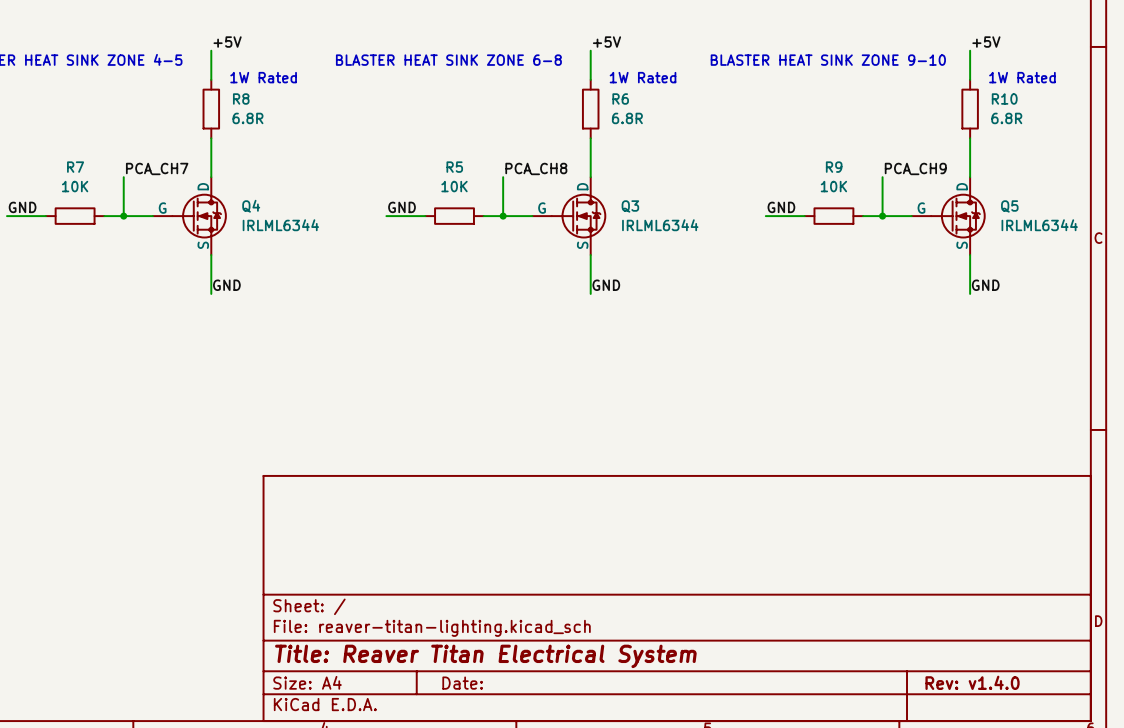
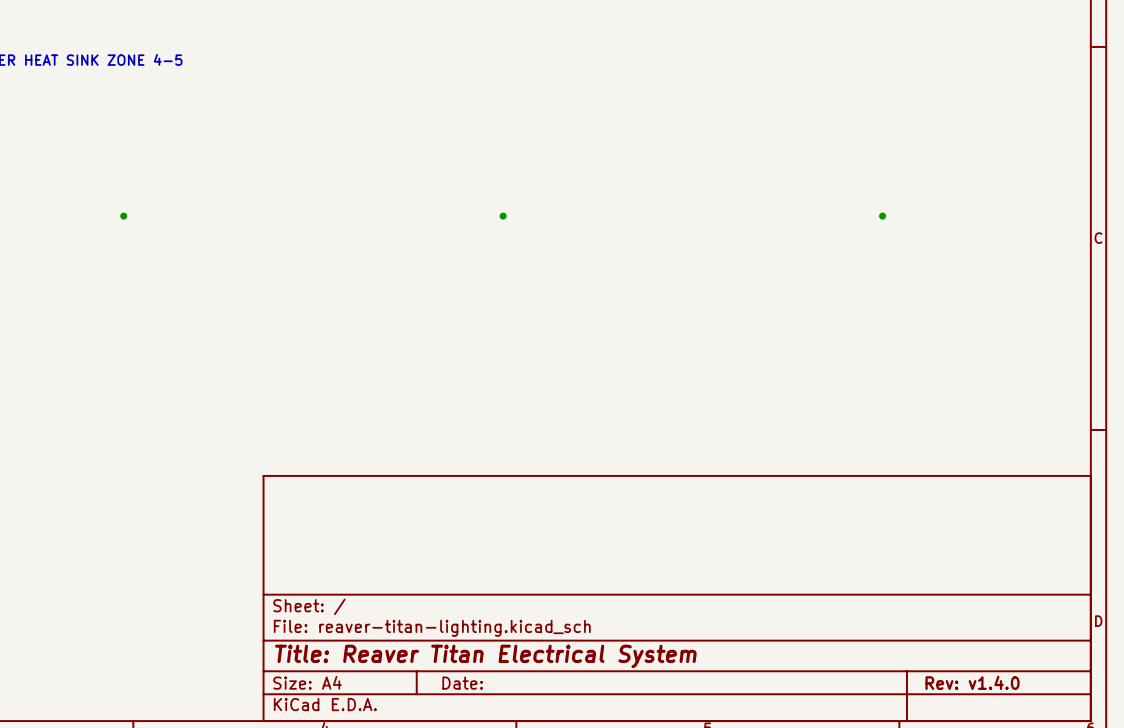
label: +5V (227, 42) -> none
label: +5V (607, 42) -> none
label: +5V (986, 42) -> none
wire: (211, 50) (211, 79) -> none
wire: (590, 50) (590, 79) -> none
wire: (970, 50) (970, 79) -> none
text: BLASTER HEAT SINK ZONE 6-8 (448, 60) -> none
text: BLASTER HEAT SINK ZONE 9-10 (828, 60) -> none
text: 1W Rated (263, 77) -> none
text: 1W Rated (643, 77) -> none
text: 1W Rated (1022, 77) -> none
R8: 6.8R (211, 109) -> none
R6: 6.8R (590, 109) -> none
R10: 6.8R (970, 109) -> none
wire: (211, 138) (211, 177) -> none
wire: (590, 138) (590, 177) -> none
wire: (970, 138) (970, 177) -> none
label: PCA_CH7 (157, 168) -> none
label: PCA_CH8 (536, 168) -> none
label: PCA_CH9 (915, 168) -> none
wire: (123, 177) (123, 216) -> none
wire: (503, 177) (503, 216) -> none
wire: (882, 177) (882, 216) -> none
label: GND (22, 207) -> none
label: GND (402, 207) -> none
label: GND (781, 207) -> none
wire: (7, 216) (45, 216) -> none
R7: 10K (75, 216) -> none
wire: (104, 216) (152, 216) -> none
Q4: IRLML6344 (189, 216) -> none
wire: (386, 216) (425, 216) -> none
R5: 10K (454, 216) -> none
wire: (483, 216) (532, 216) -> none
Q3: IRLML6344 (569, 216) -> none
wire: (765, 216) (804, 216) -> none
R9: 10K (833, 216) -> none
wire: (863, 216) (911, 216) -> none
Q5: IRLML6344 (948, 216) -> none
wire: (211, 255) (211, 293) -> none
wire: (590, 255) (590, 293) -> none
wire: (970, 255) (970, 293) -> none
label: GND (226, 285) -> none
label: GND (606, 285) -> none
label: GND (985, 285) -> none

